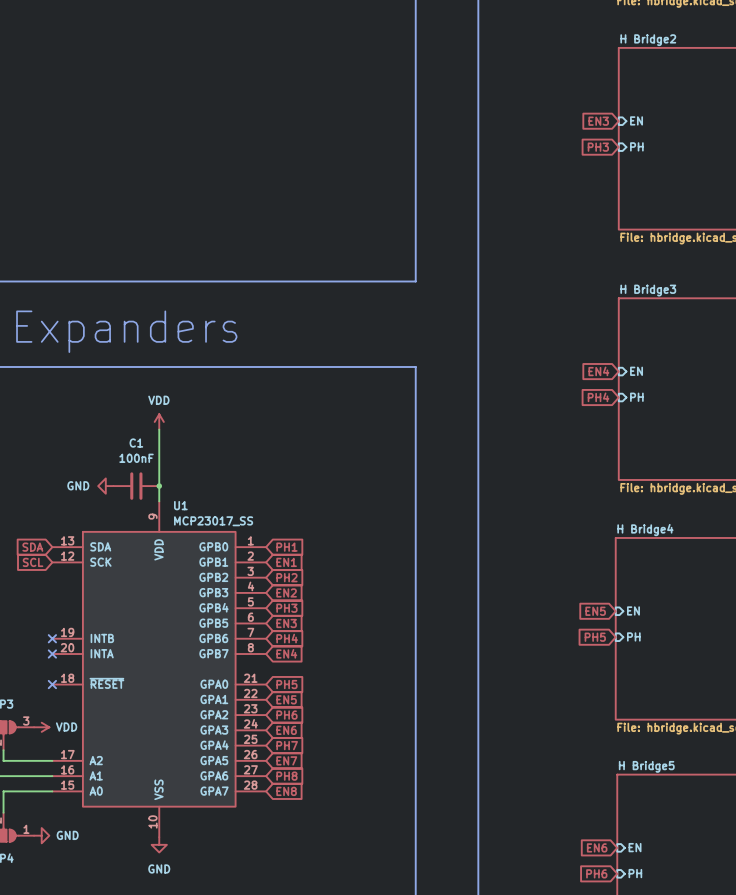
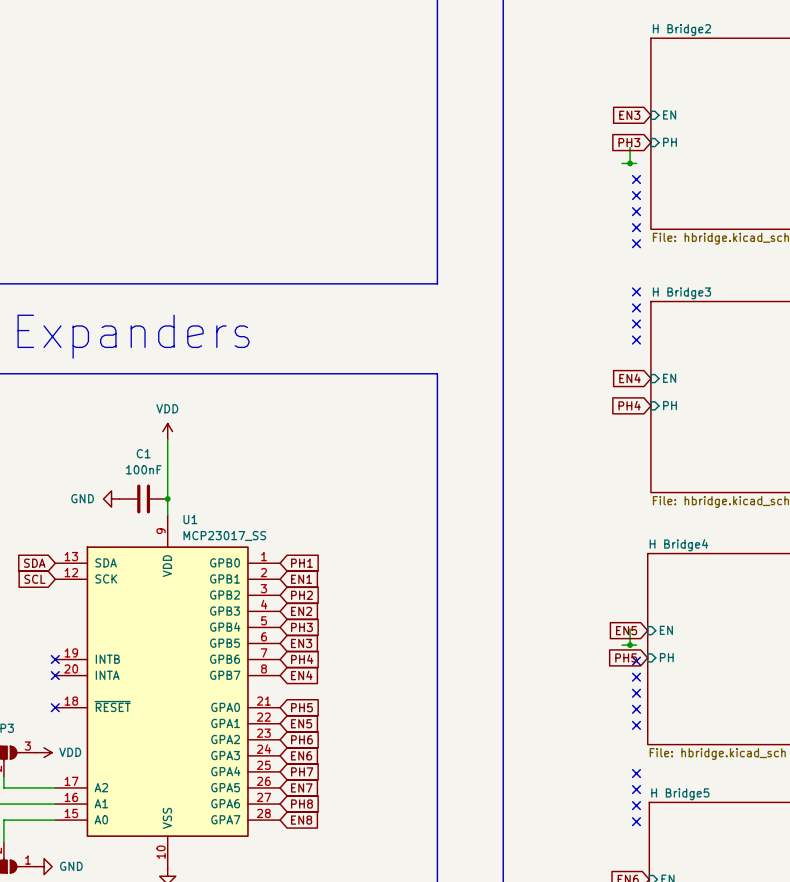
wire: none -> (630, 147) (630, 163)
wire: none -> (622, 163) (636, 163)
junction: none -> (630, 163)
no-connect mark: none -> (636, 179)
no-connect mark: none -> (636, 195)
no-connect mark: none -> (636, 211)
no-connect mark: none -> (636, 227)
no-connect mark: none -> (636, 243)
no-connect mark: none -> (636, 291)
no-connect mark: none -> (636, 307)
no-connect mark: none -> (636, 324)
no-connect mark: none -> (636, 340)
wire: none -> (630, 629) (630, 645)
wire: none -> (622, 645) (636, 645)
junction: none -> (630, 645)
no-connect mark: none -> (636, 661)
no-connect mark: none -> (636, 677)
no-connect mark: none -> (636, 693)
no-connect mark: none -> (636, 709)
no-connect mark: none -> (636, 725)
no-connect mark: none -> (636, 773)
no-connect mark: none -> (636, 789)
no-connect mark: none -> (636, 805)
no-connect mark: none -> (636, 821)

